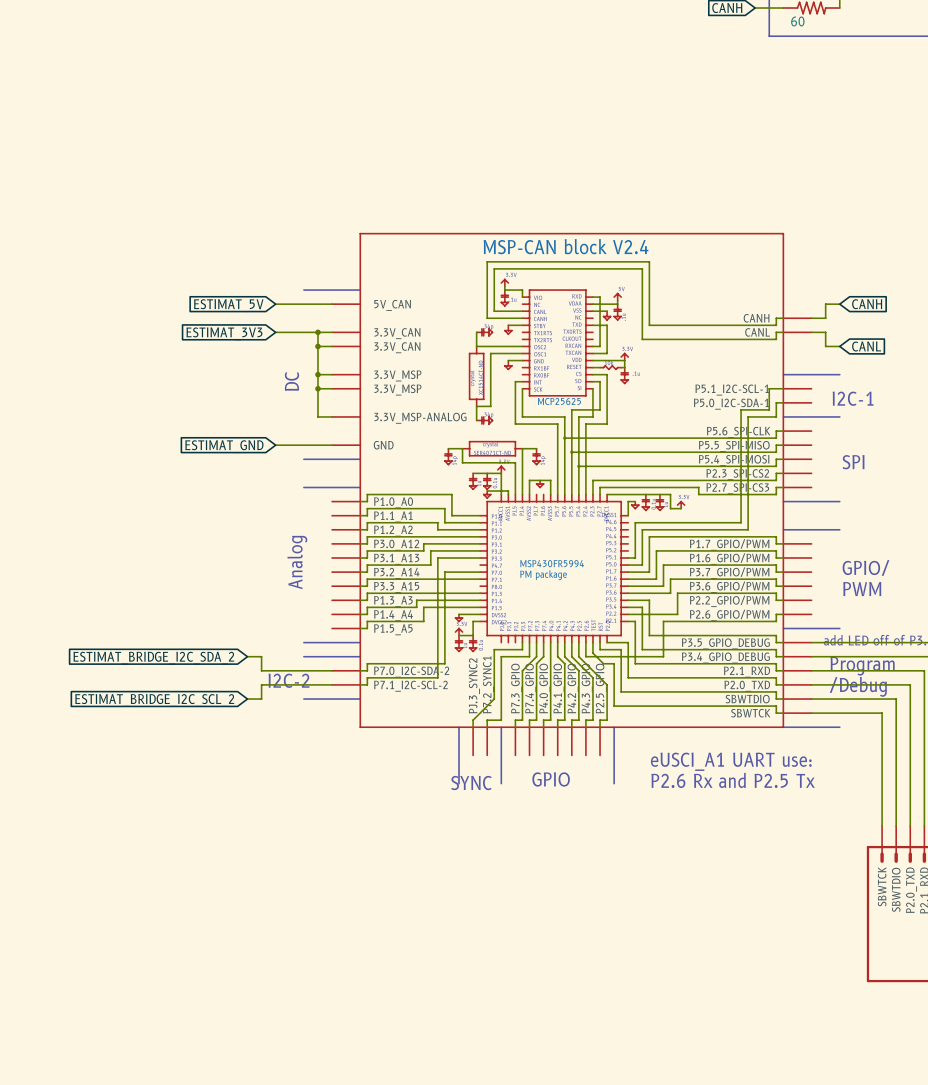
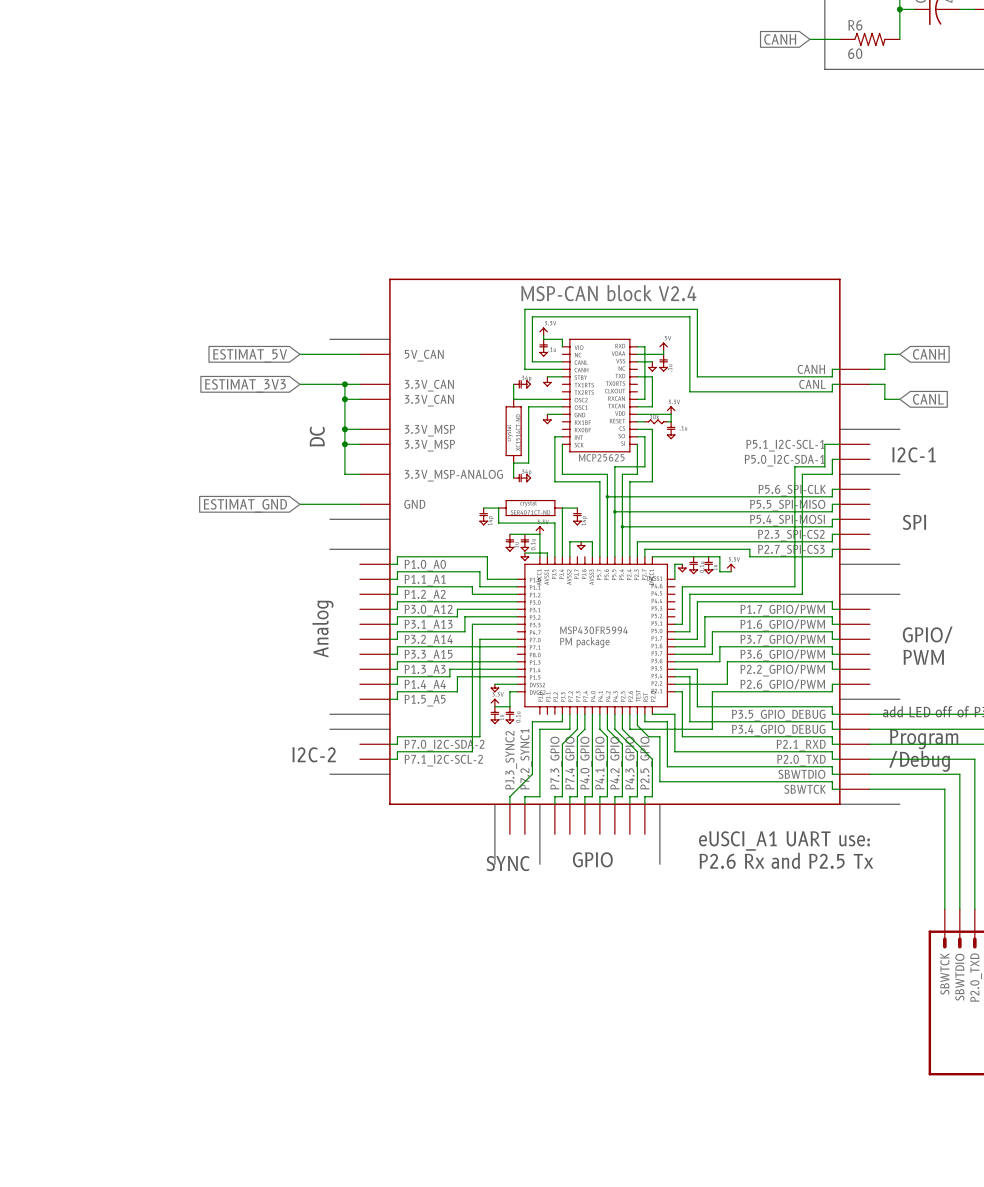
wire: (247, 656) (261, 656) (261, 670) (332, 670) -> none
global label: ESTIMAT_BRIDGE_I2C_SDA_2 (153, 658) -> none
wire: (332, 684) (261, 684) (261, 699) (247, 699) -> none
global label: ESTIMAT_BRIDGE_I2C_SCL_2 (154, 700) -> none

